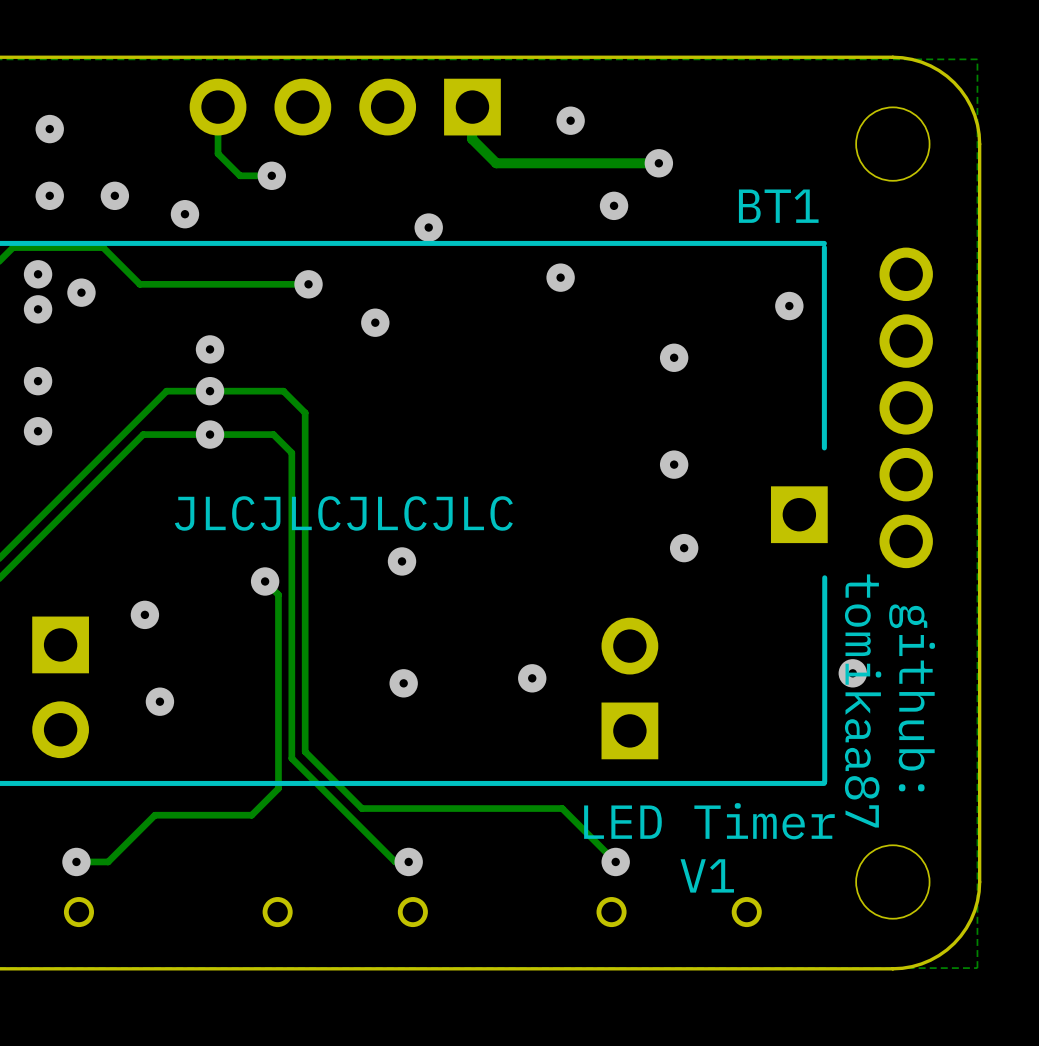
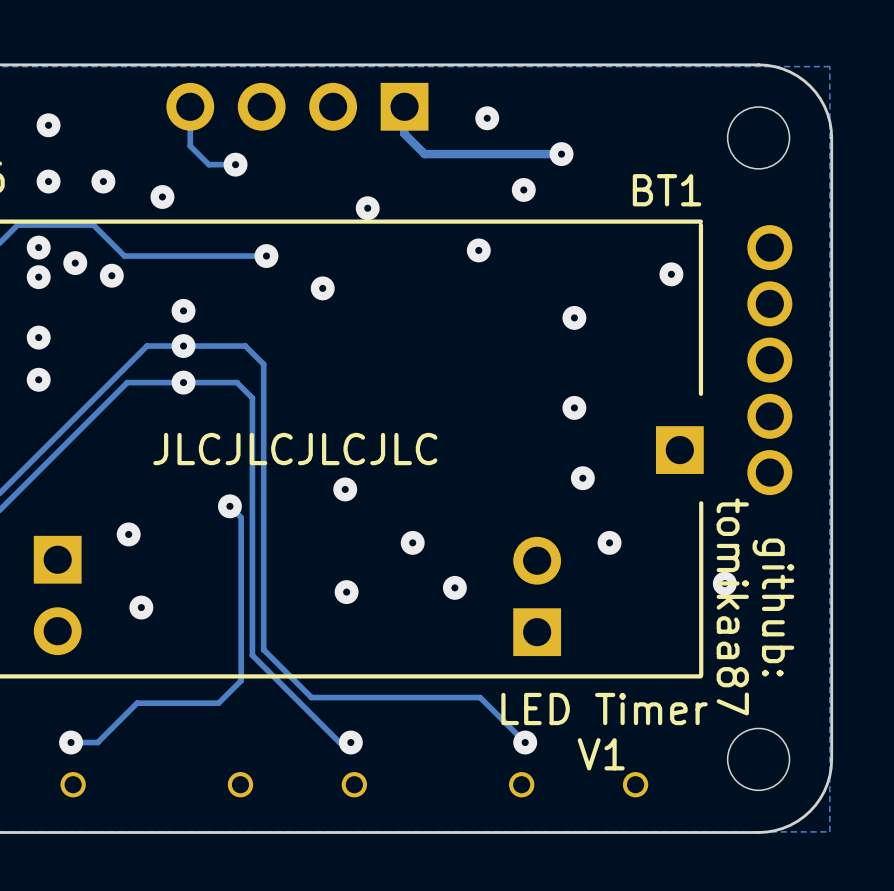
via: none -> (111, 275)
via: none -> (412, 542)
via: none -> (609, 542)

